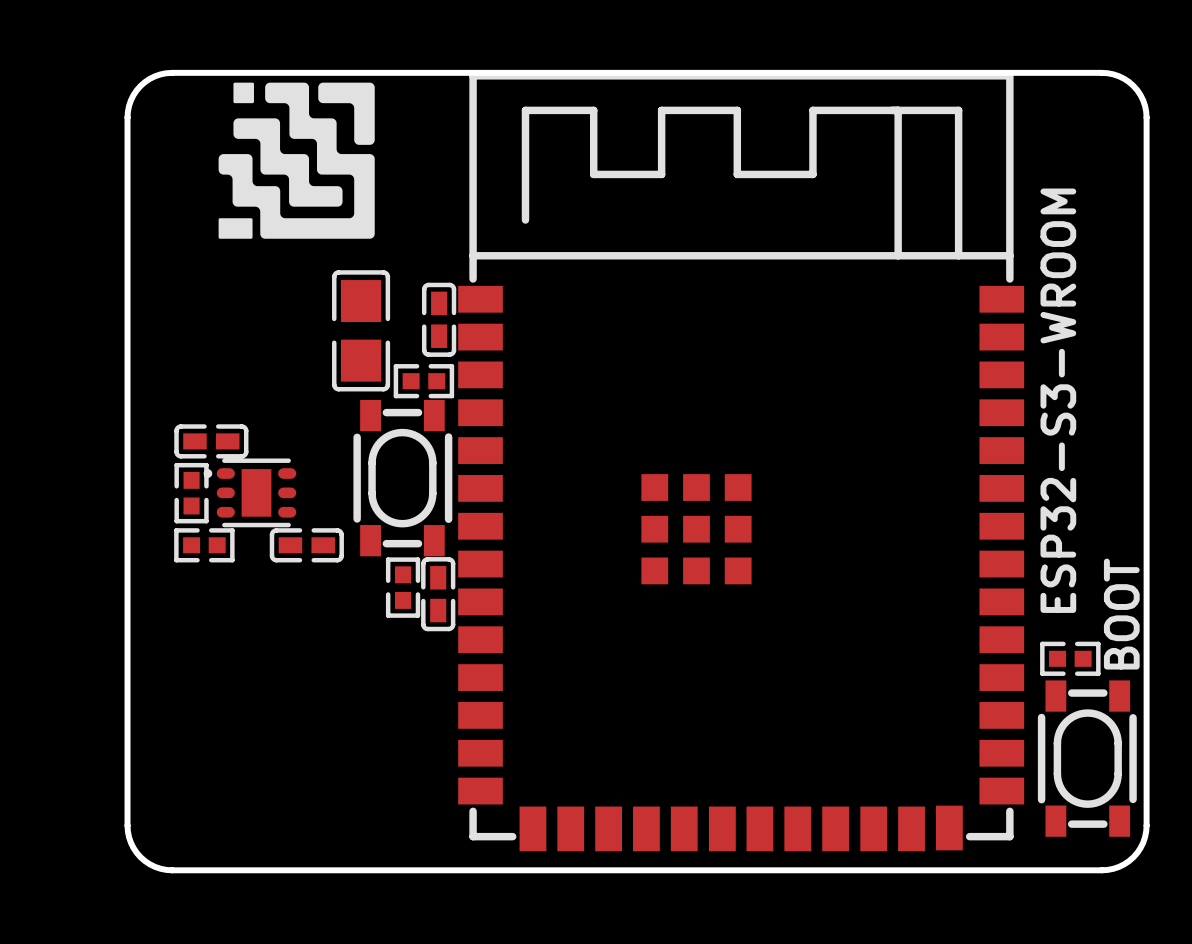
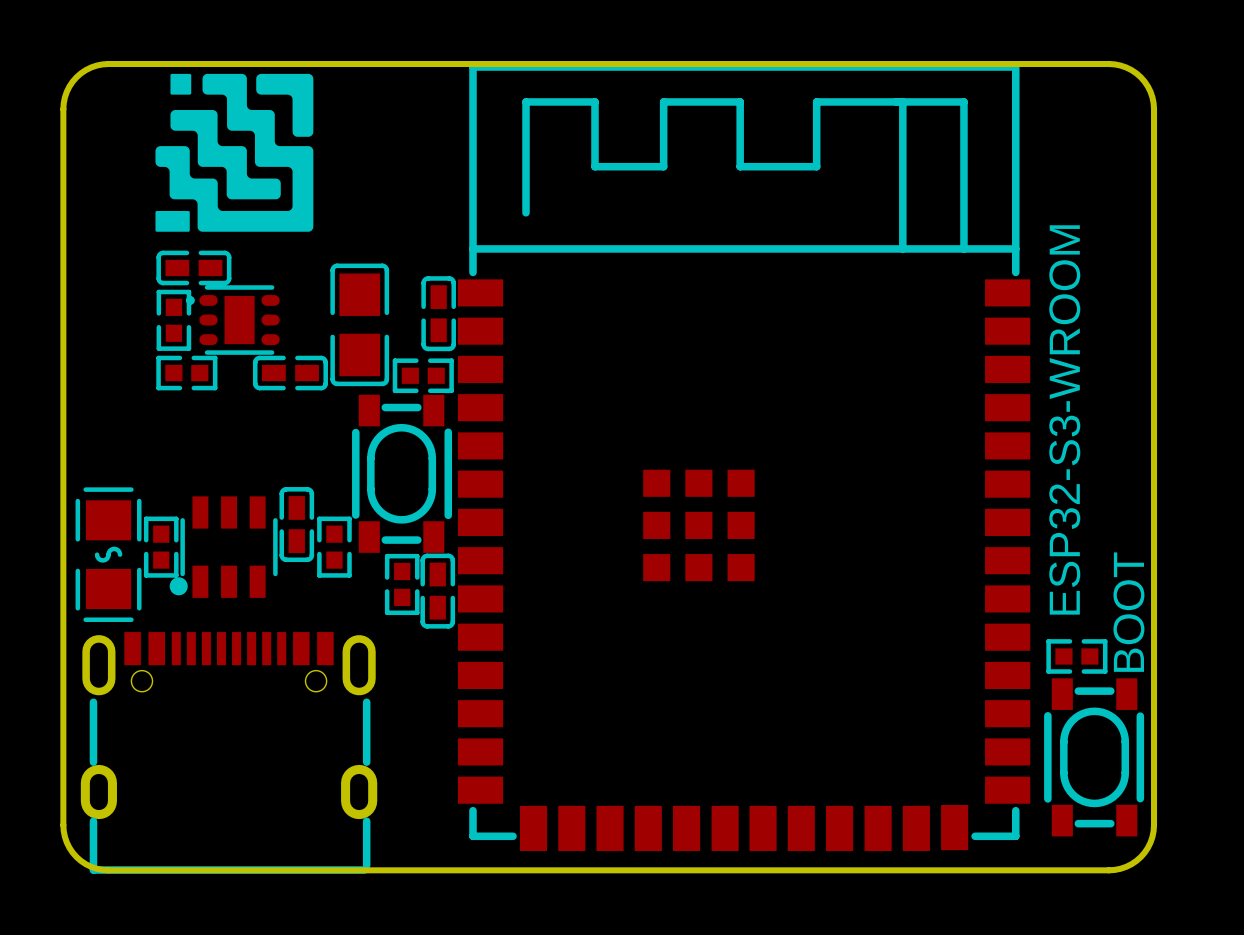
board edge: (172, 72) (155, 76) (140, 85) (130, 100) (127, 117) (127, 825) (130, 842) (140, 857) (155, 866) (172, 870) -> (168, 64) (108, 64) (91, 67) (76, 77) (69, 86) (64, 97) (63, 109) (63, 831) (66, 842) (72, 852) (81, 860) (91, 866) (108, 870) (168, 870)
drawing position: (243, 92) -> (180, 84)
drawing position: (346, 113) -> (284, 105)
drawing position: (296, 160) -> (234, 152)
drawing position: (287, 162) -> (225, 154)
drawing position: (235, 228) -> (172, 221)
part: none -> (193, 267)
part: none -> (173, 320)
part: none -> (186, 373)
part: none -> (290, 373)
part: (211, 441) -> none
part position: (249, 492) -> (232, 320)
part: (191, 493) -> none
part: (204, 545) -> none
part rotation: 0° (306, 545) -> 90° clockwise (296, 524)
part: none -> (161, 547)
part: none -> (223, 547)
part: none -> (334, 547)
part: none -> (108, 554)
part: none -> (229, 752)

